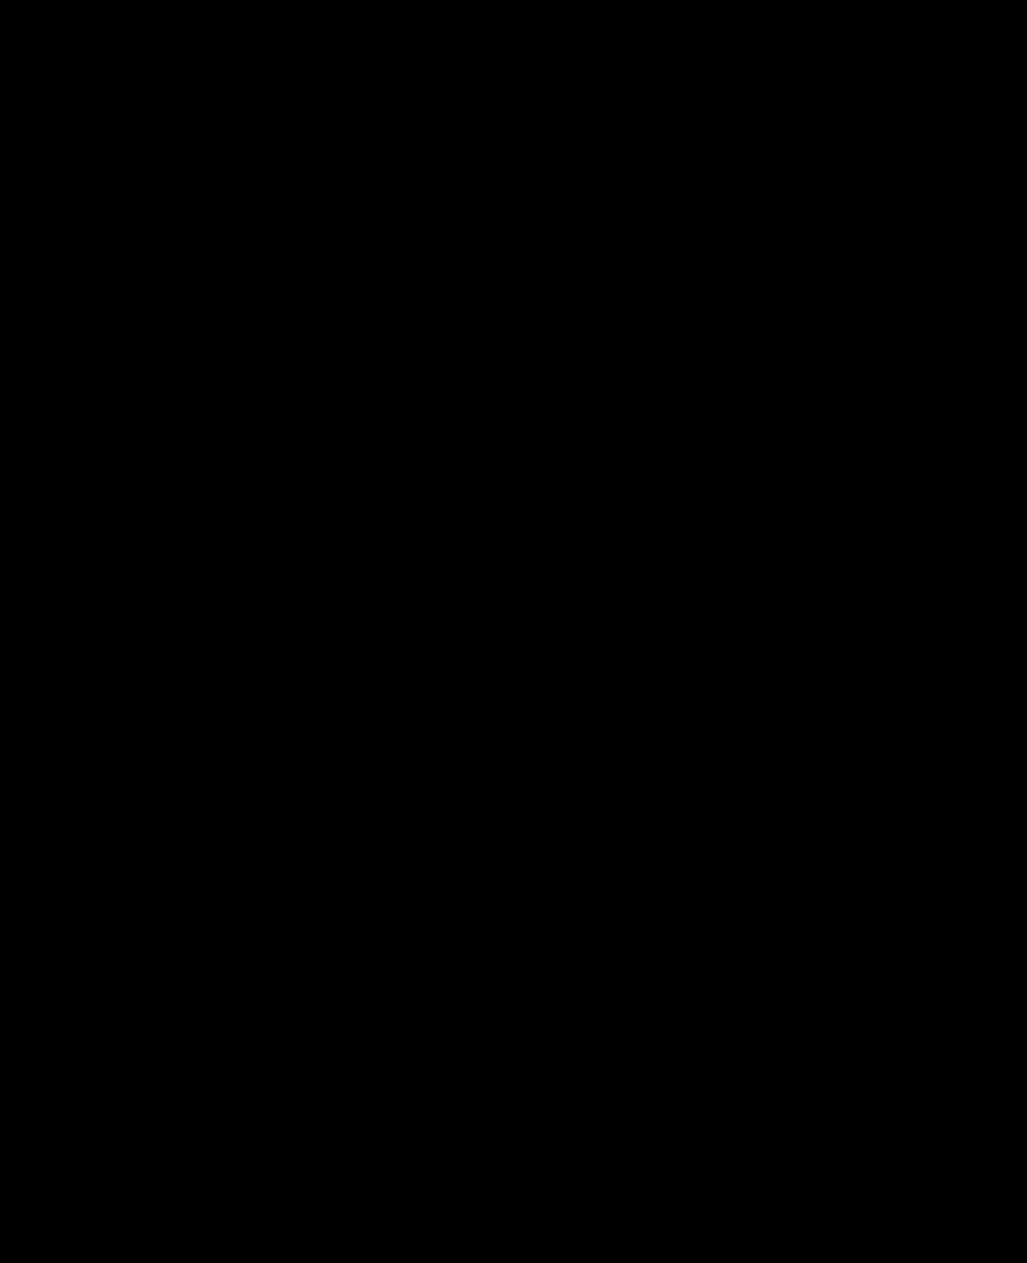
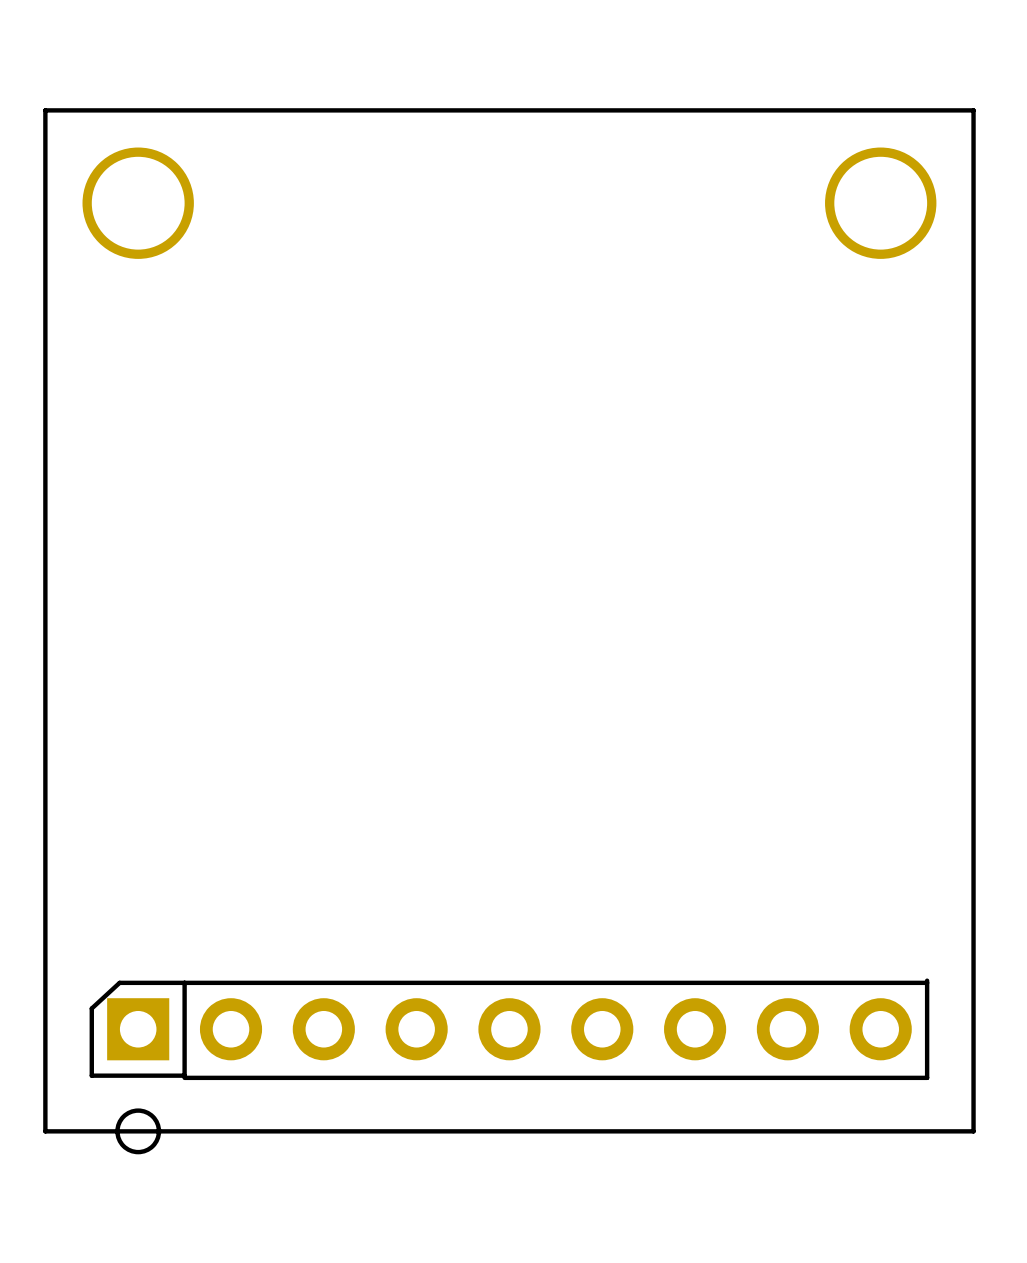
part: none -> (509, 631)

